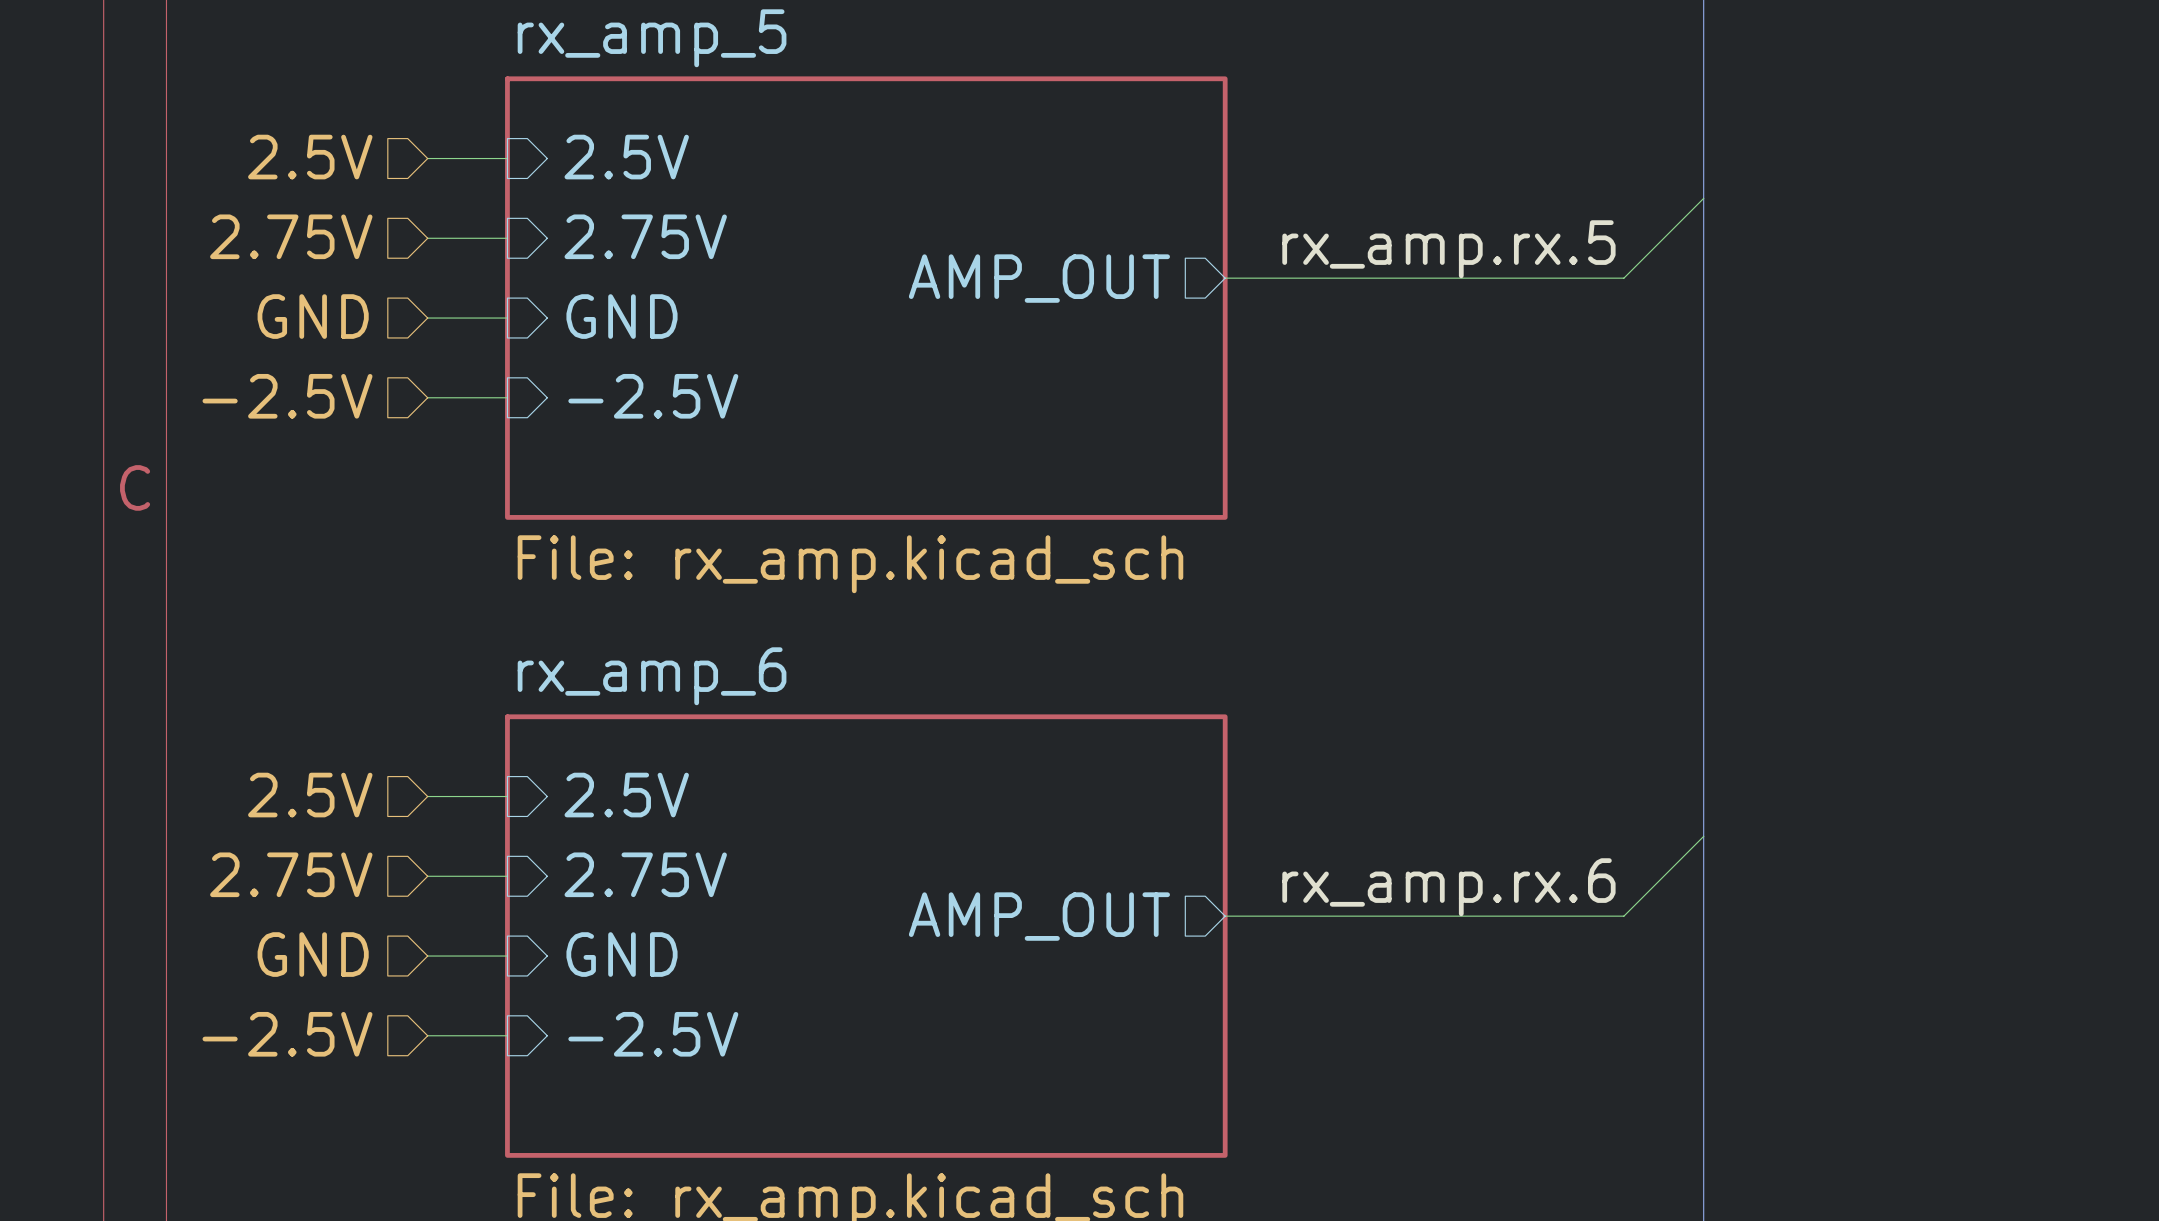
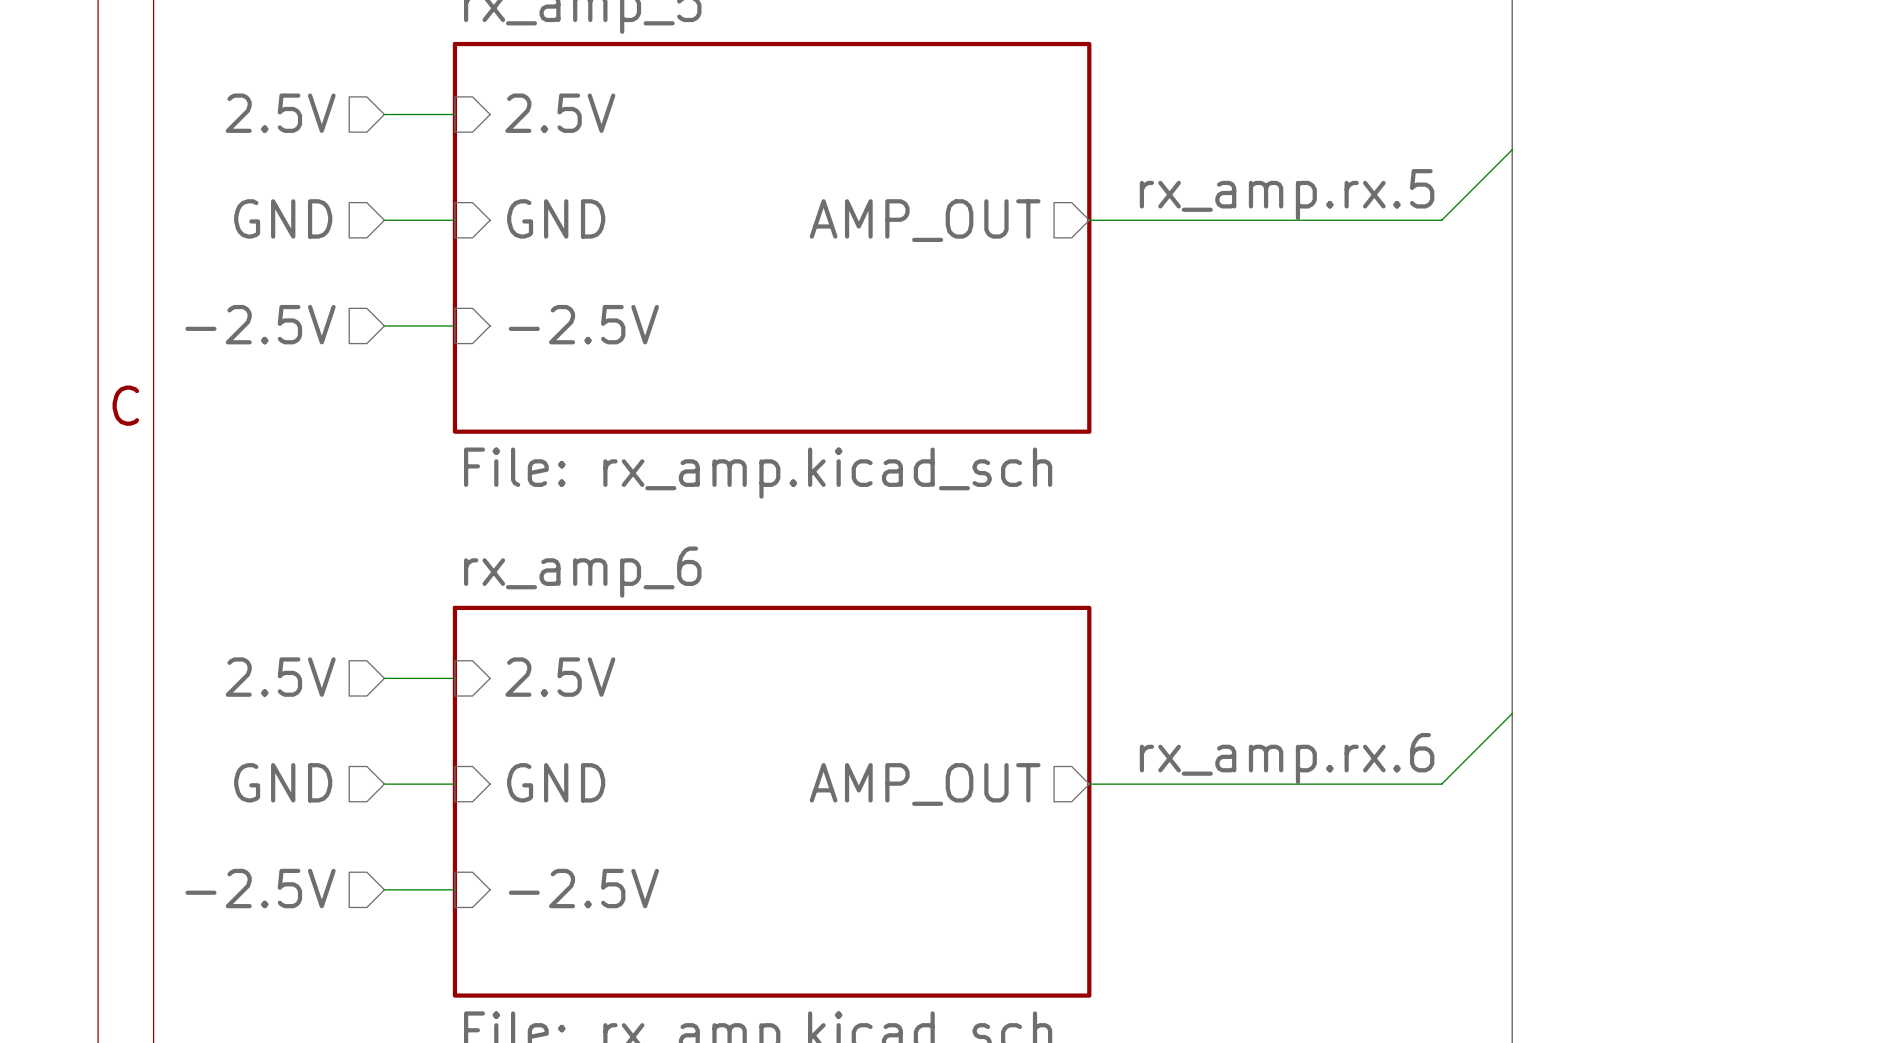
hierarchical label: 2.75V (291, 236) -> none
sheet pin: 2.75V (645, 236) -> none
wire: (427, 238) (507, 238) -> none
hierarchical label position: GND (313, 316) -> GND (283, 218)
sheet pin position: GND (621, 316) -> GND (556, 218)
wire: (427, 318) (507, 318) -> (384, 220) (454, 220)
hierarchical label: 2.75V (291, 874) -> none
sheet pin: 2.75V (645, 874) -> none
wire: (427, 876) (507, 876) -> (384, 784) (454, 784)
hierarchical label position: GND (313, 954) -> GND (283, 782)
sheet pin position: GND (621, 954) -> GND (556, 782)
wire: (427, 956) (507, 956) -> none

